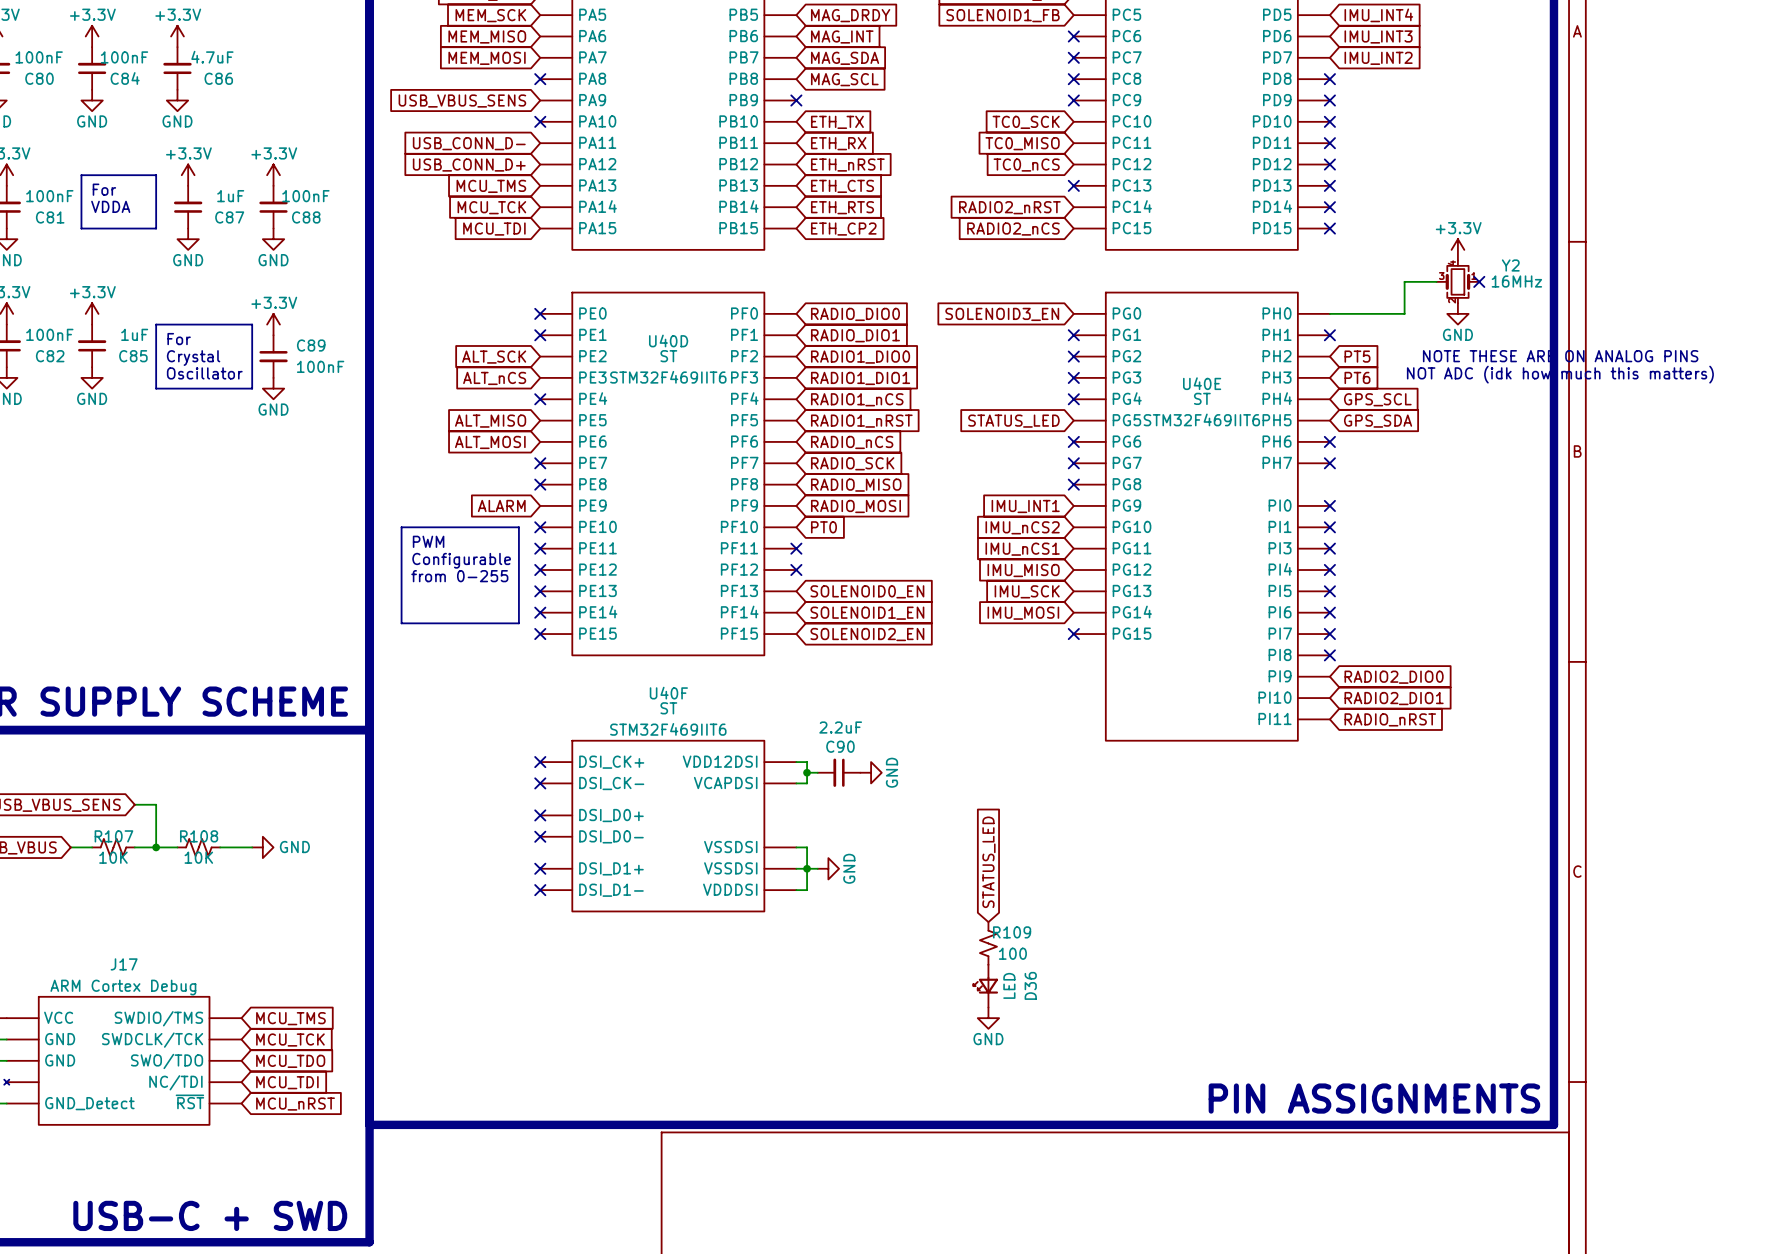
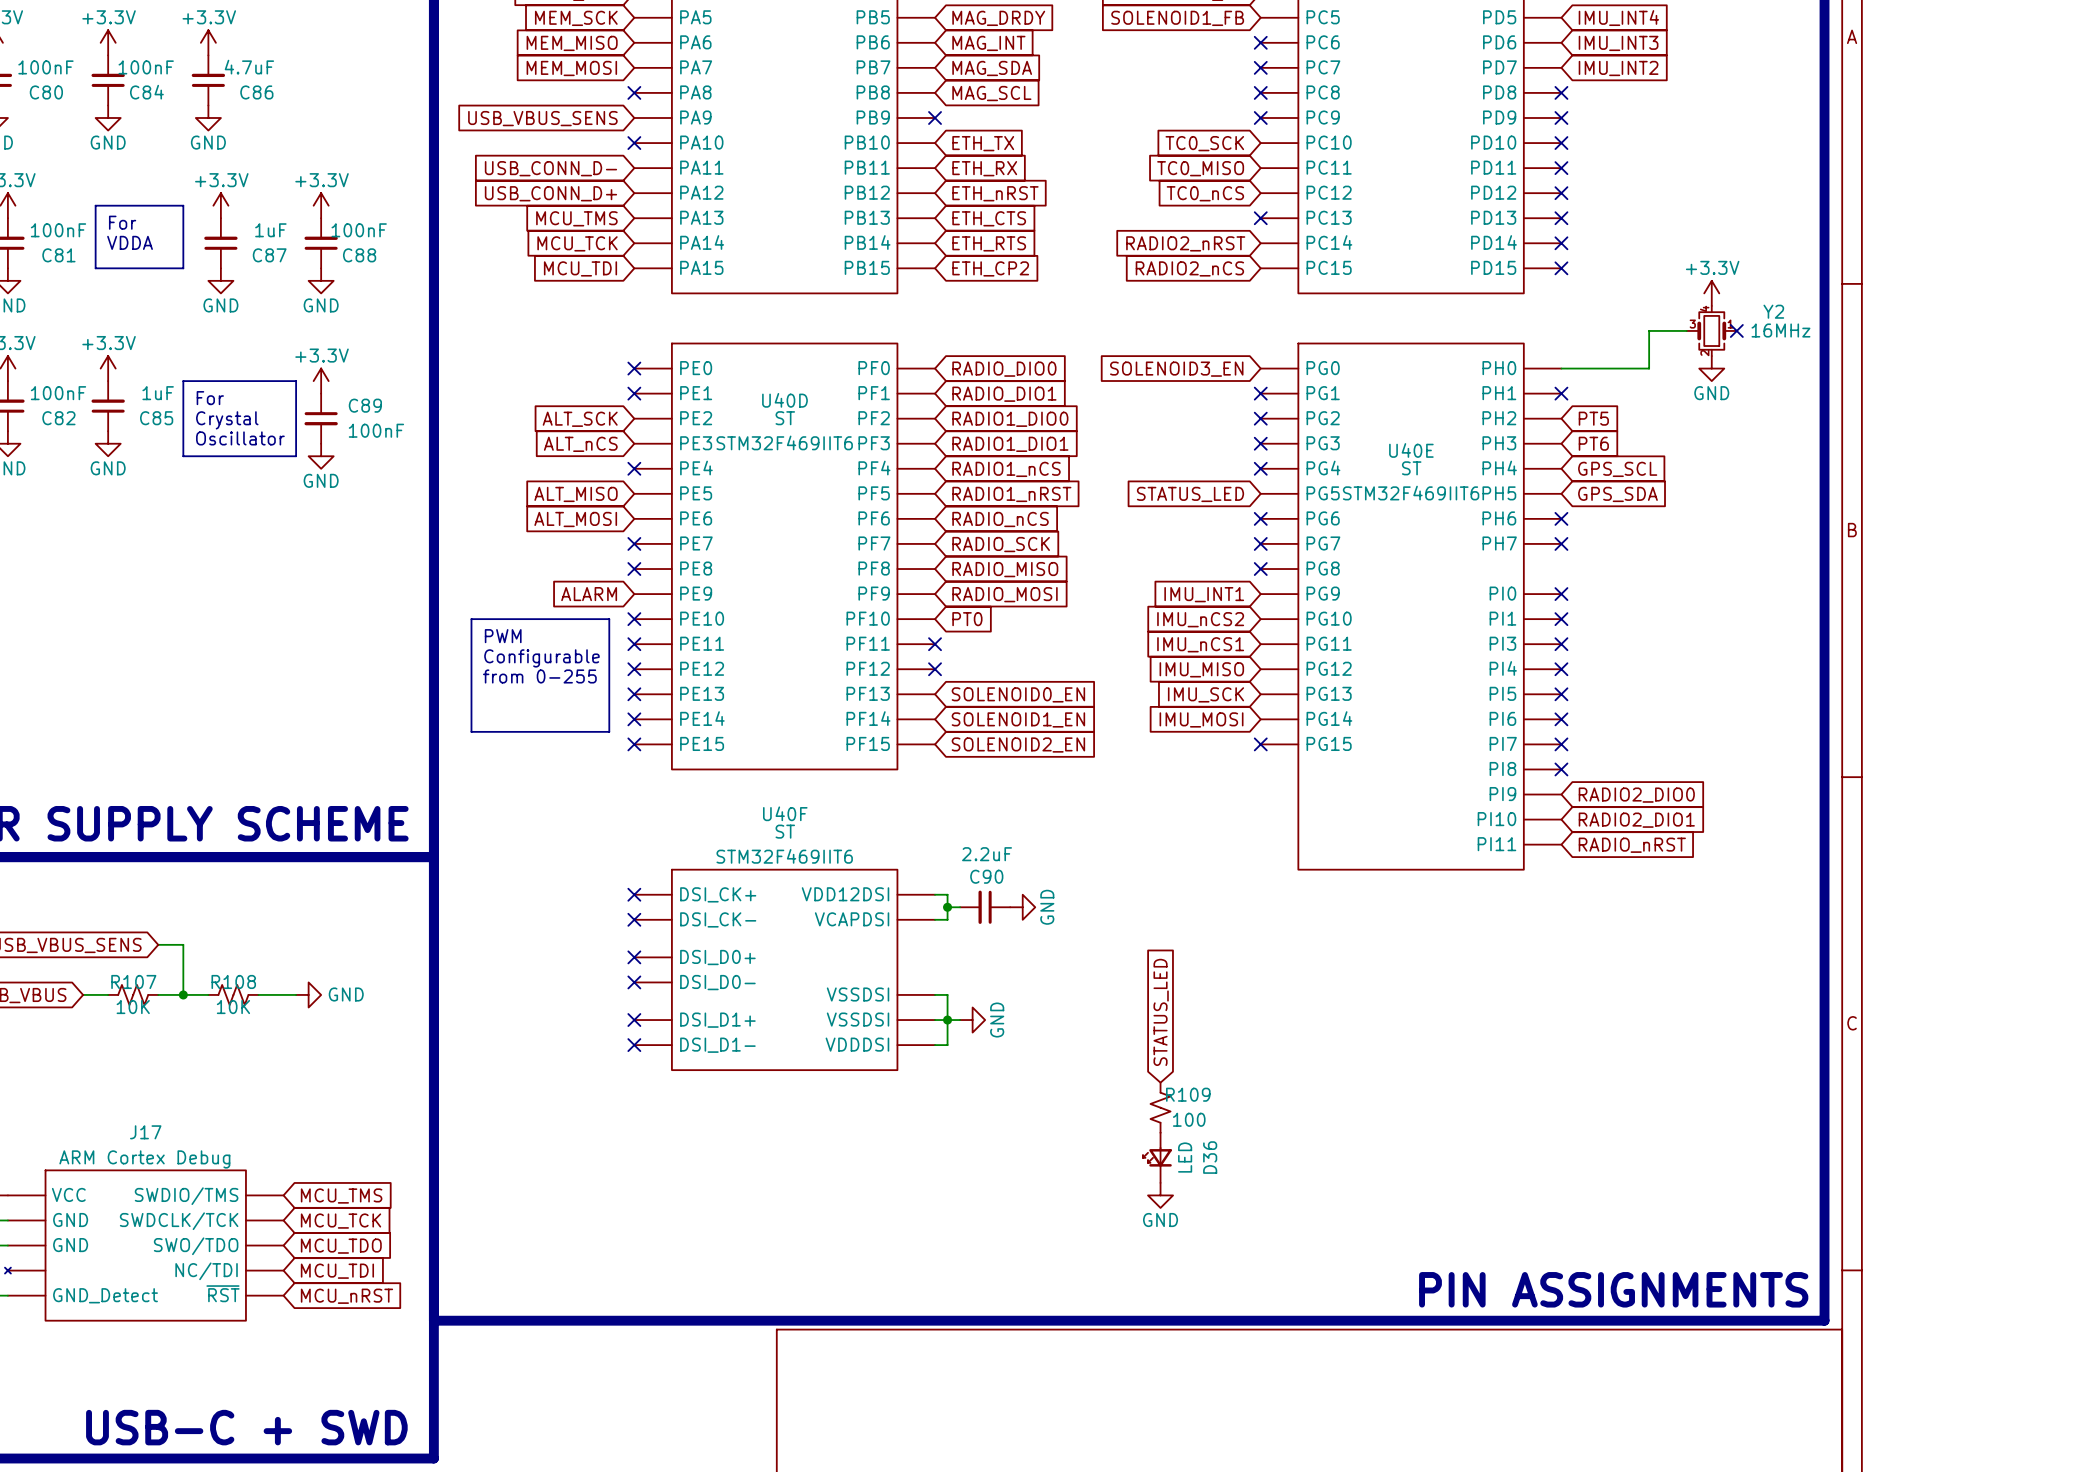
text: NOTE THESE ARE ON ANALOG PINS (1560, 356) -> none
text: NOT ADC (idk how much this matters) (1560, 374) -> none

